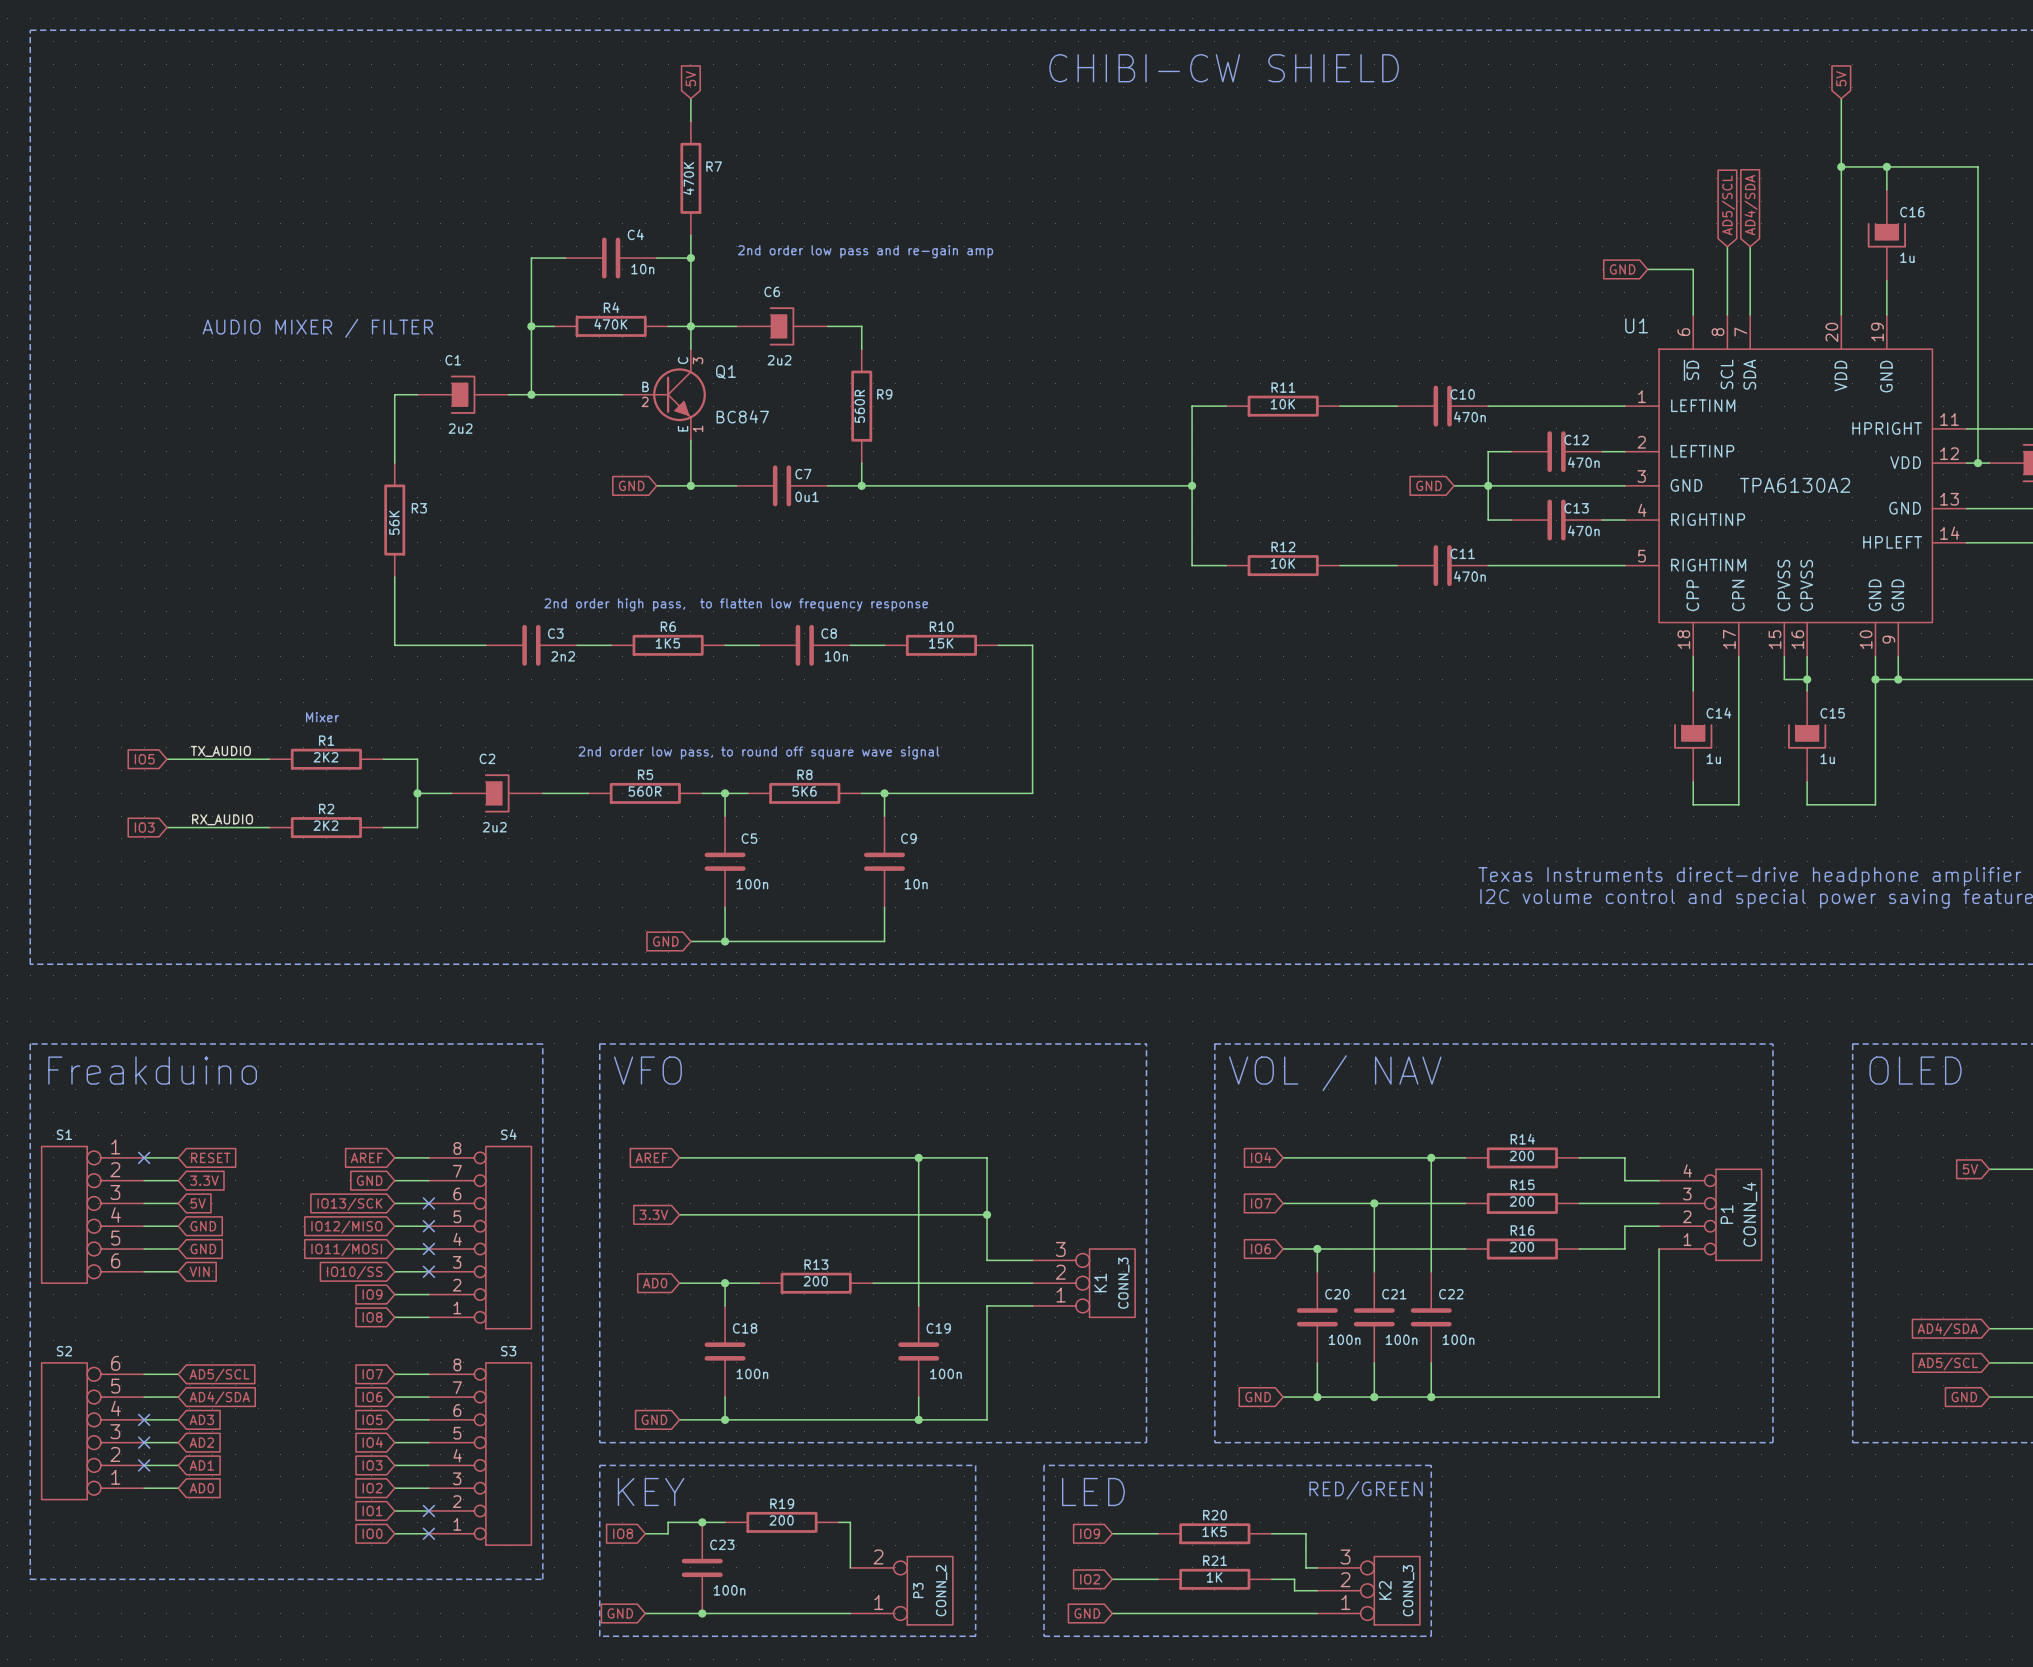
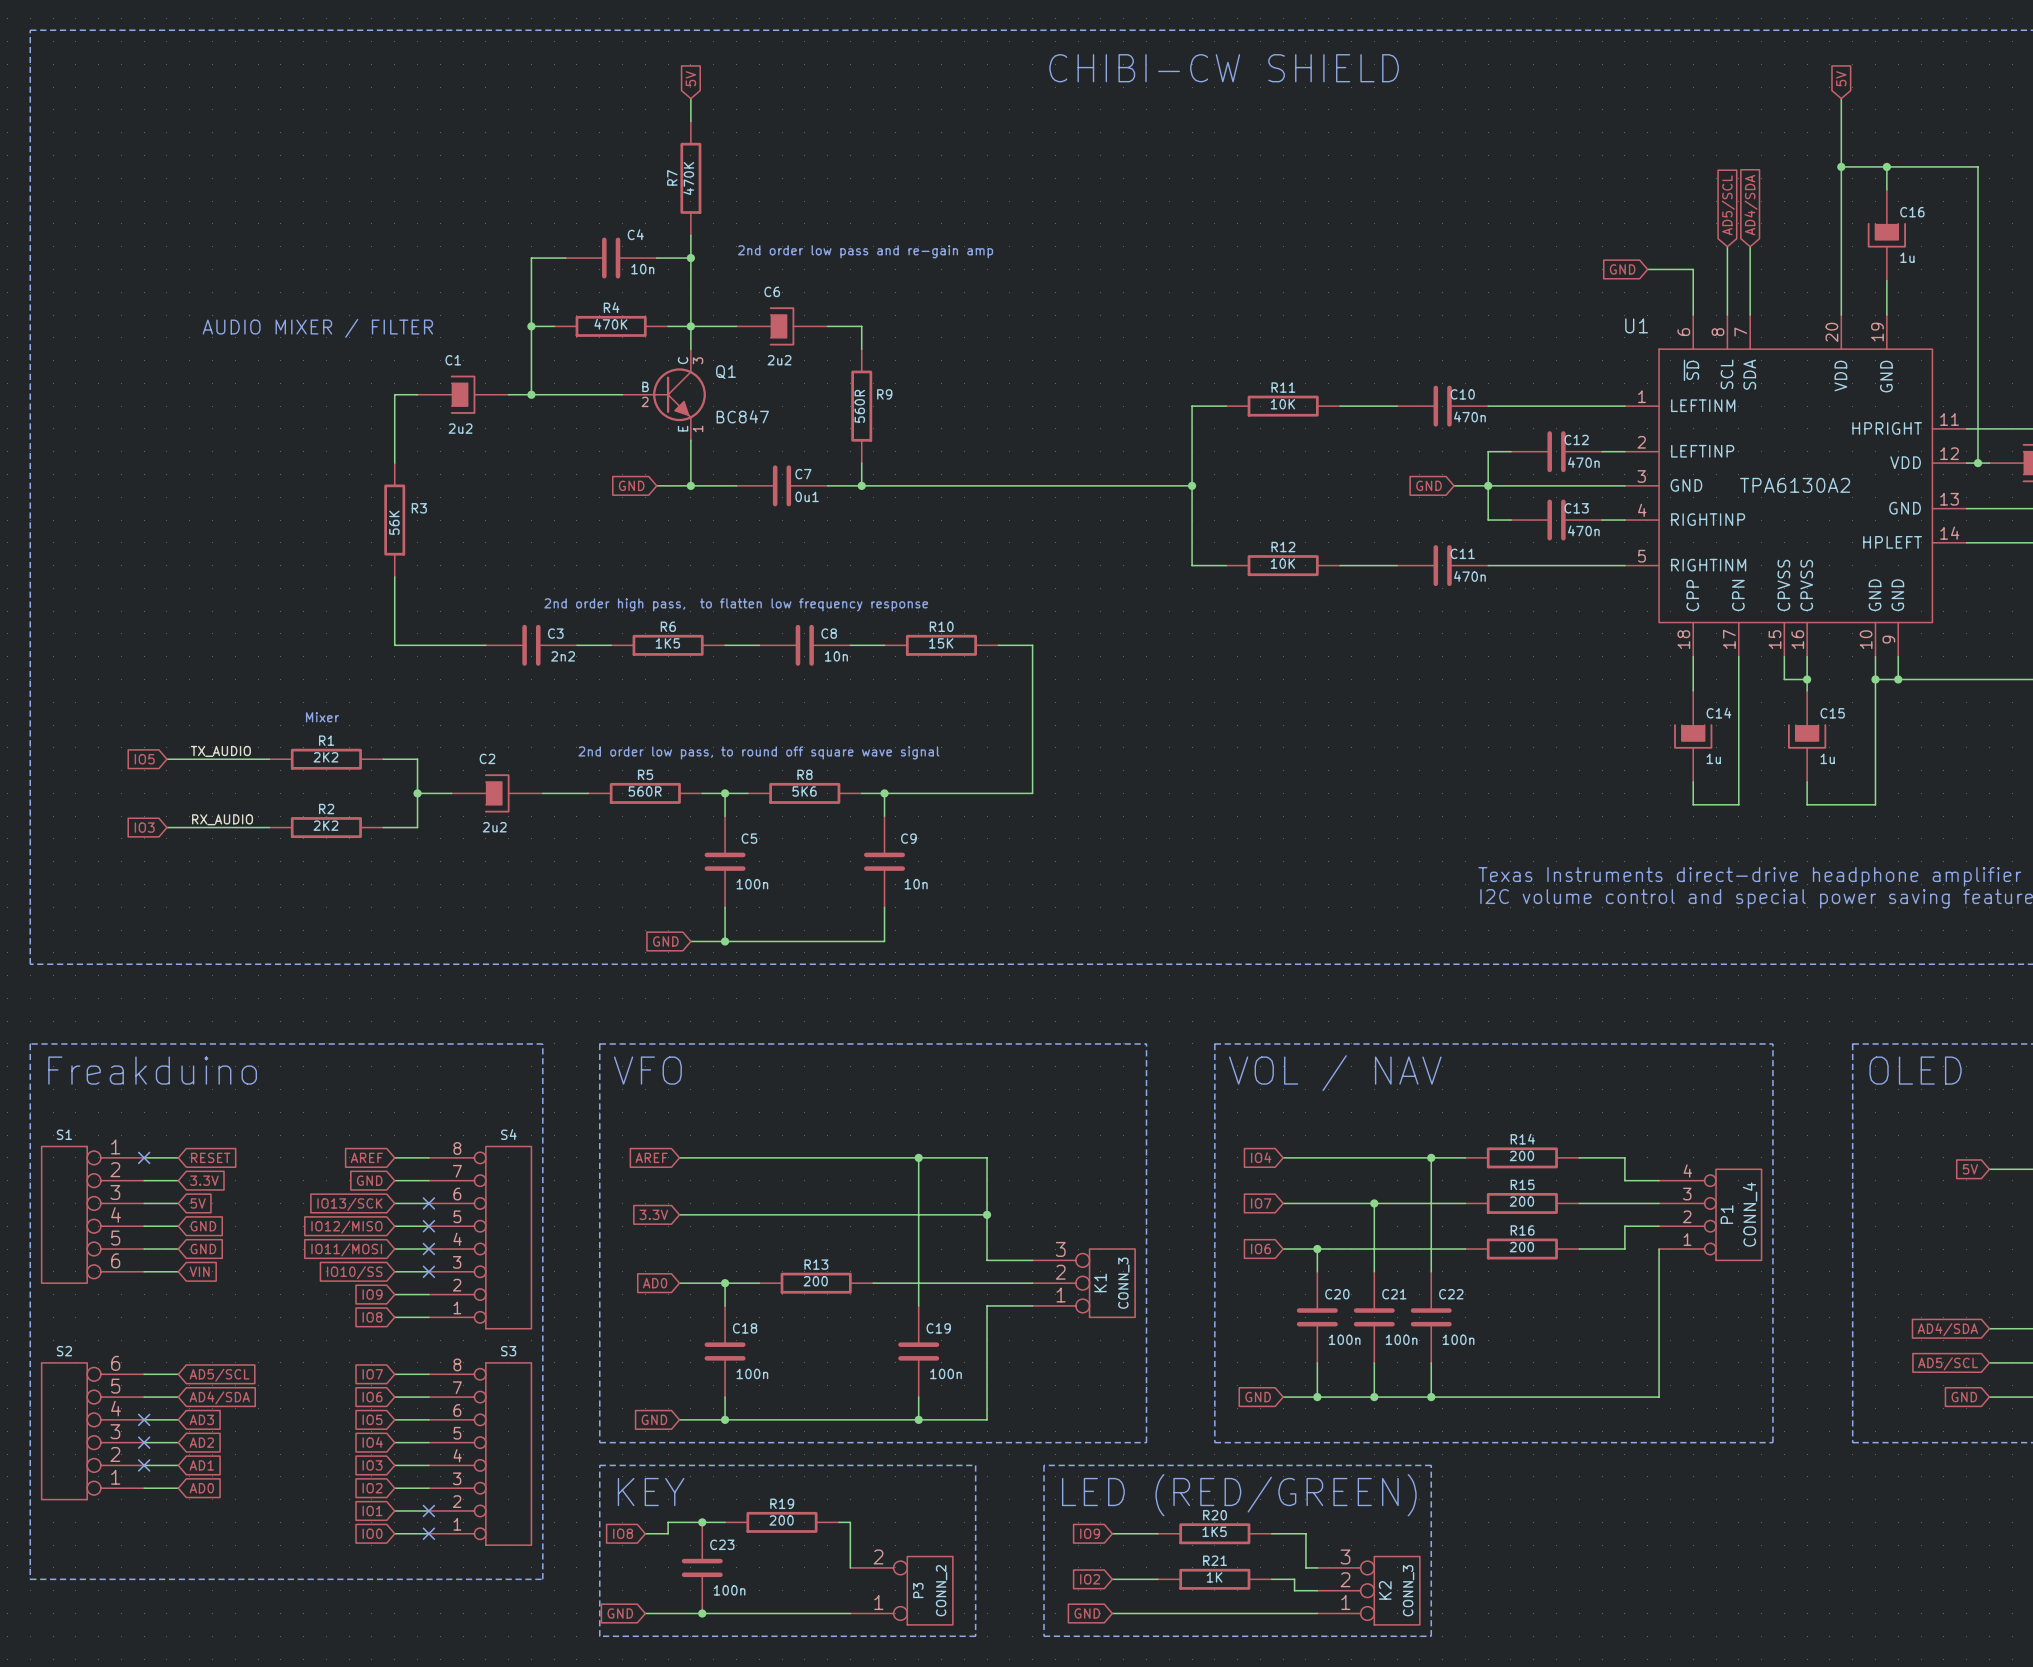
R7 name rotation: 0° (714, 166) -> 90° counterclockwise (672, 177)
R7 name position: R7 (714, 166) -> R7 (672, 177)
text: RED/GREEN (1366, 1490) -> none
text: LED (1093, 1492) -> LED (RED/GREEN) (1239, 1495)

